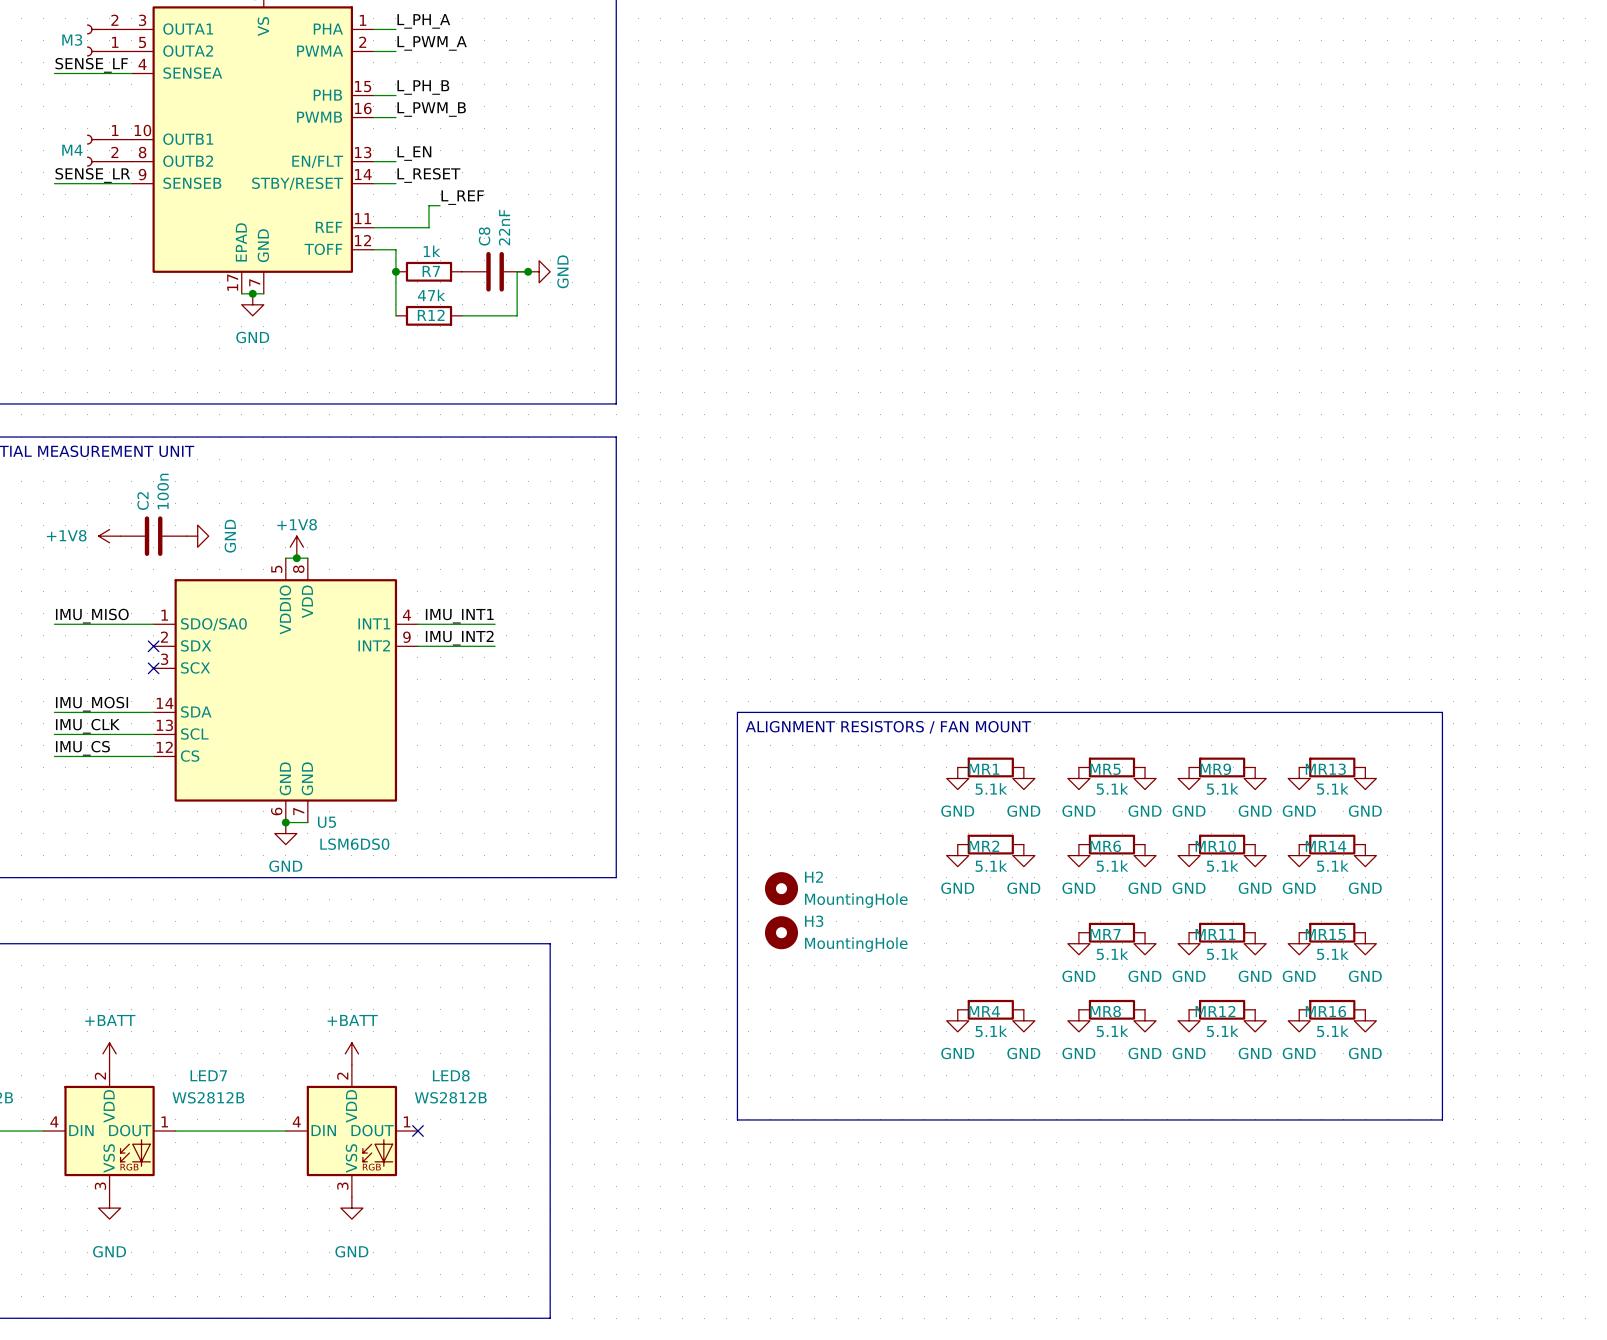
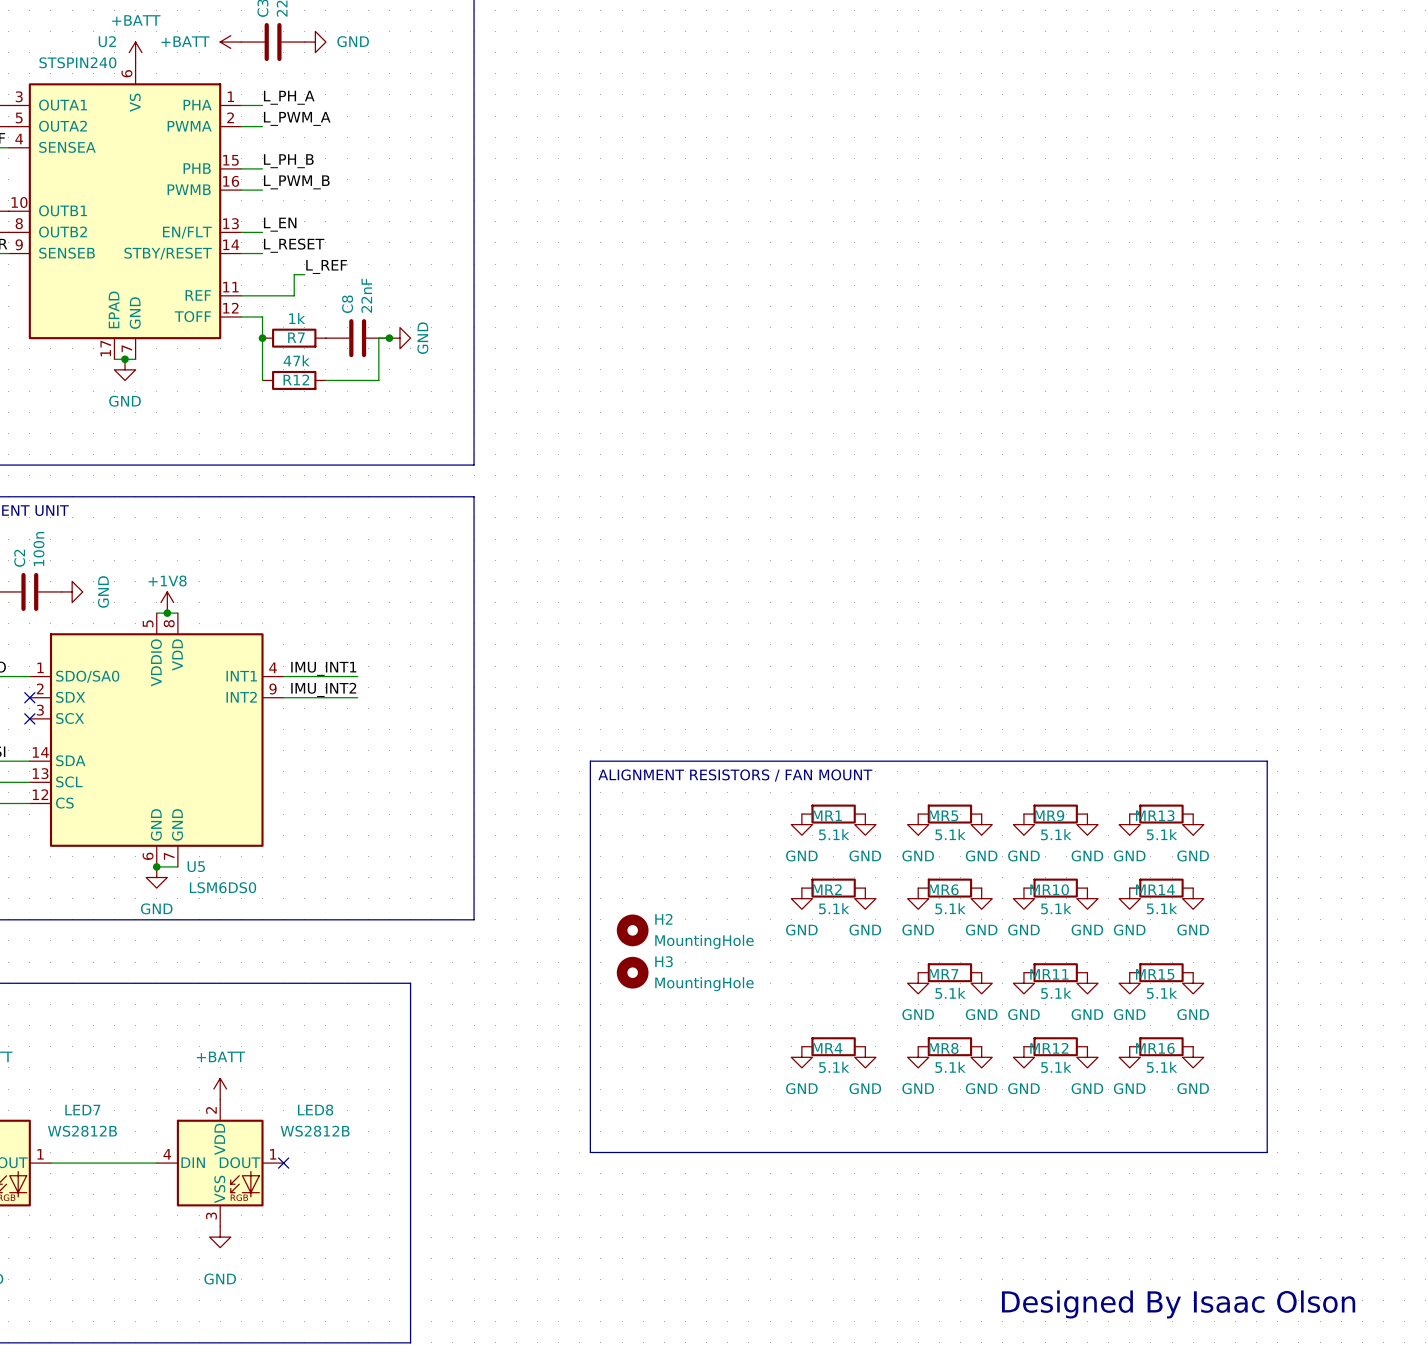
text: none -> Designed By Isaac Olson (1178, 1304)

